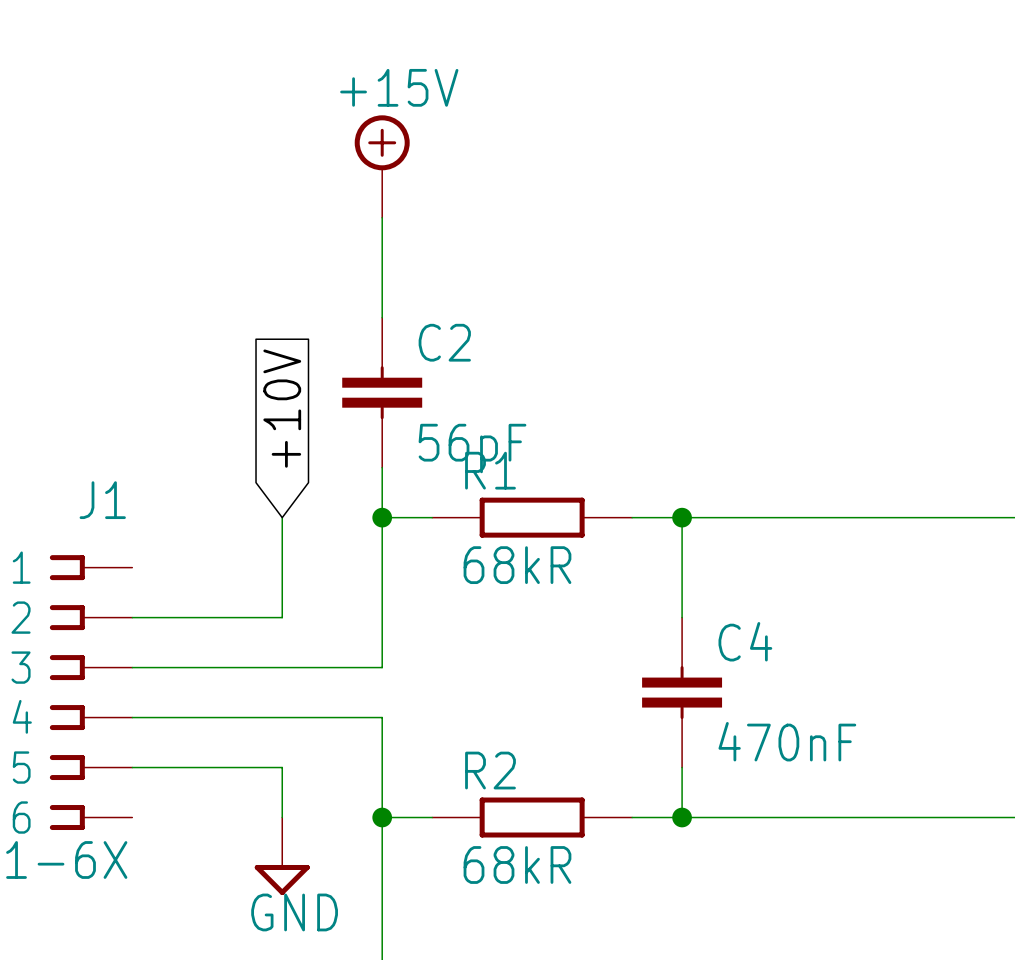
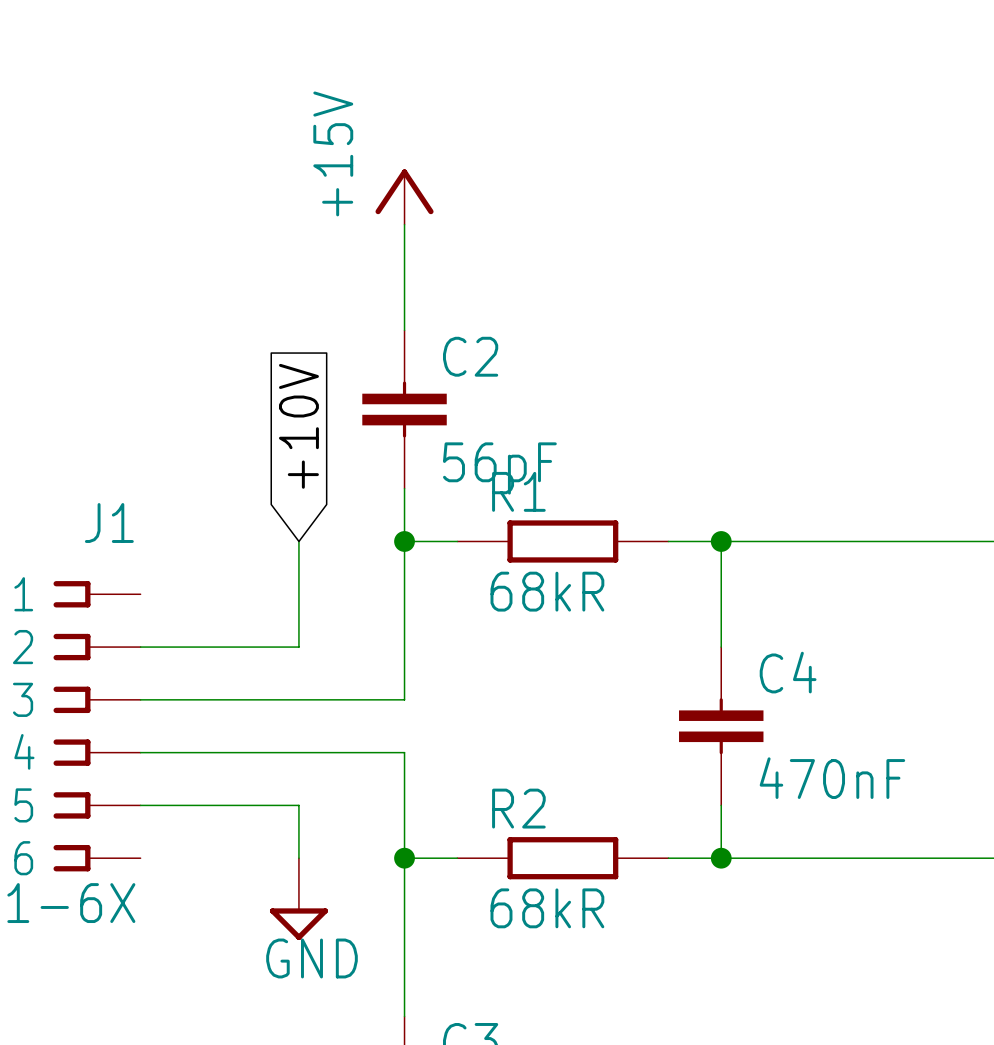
power symbol: +15V (382, 166) -> none
power symbol: none -> +15V (404, 197)

